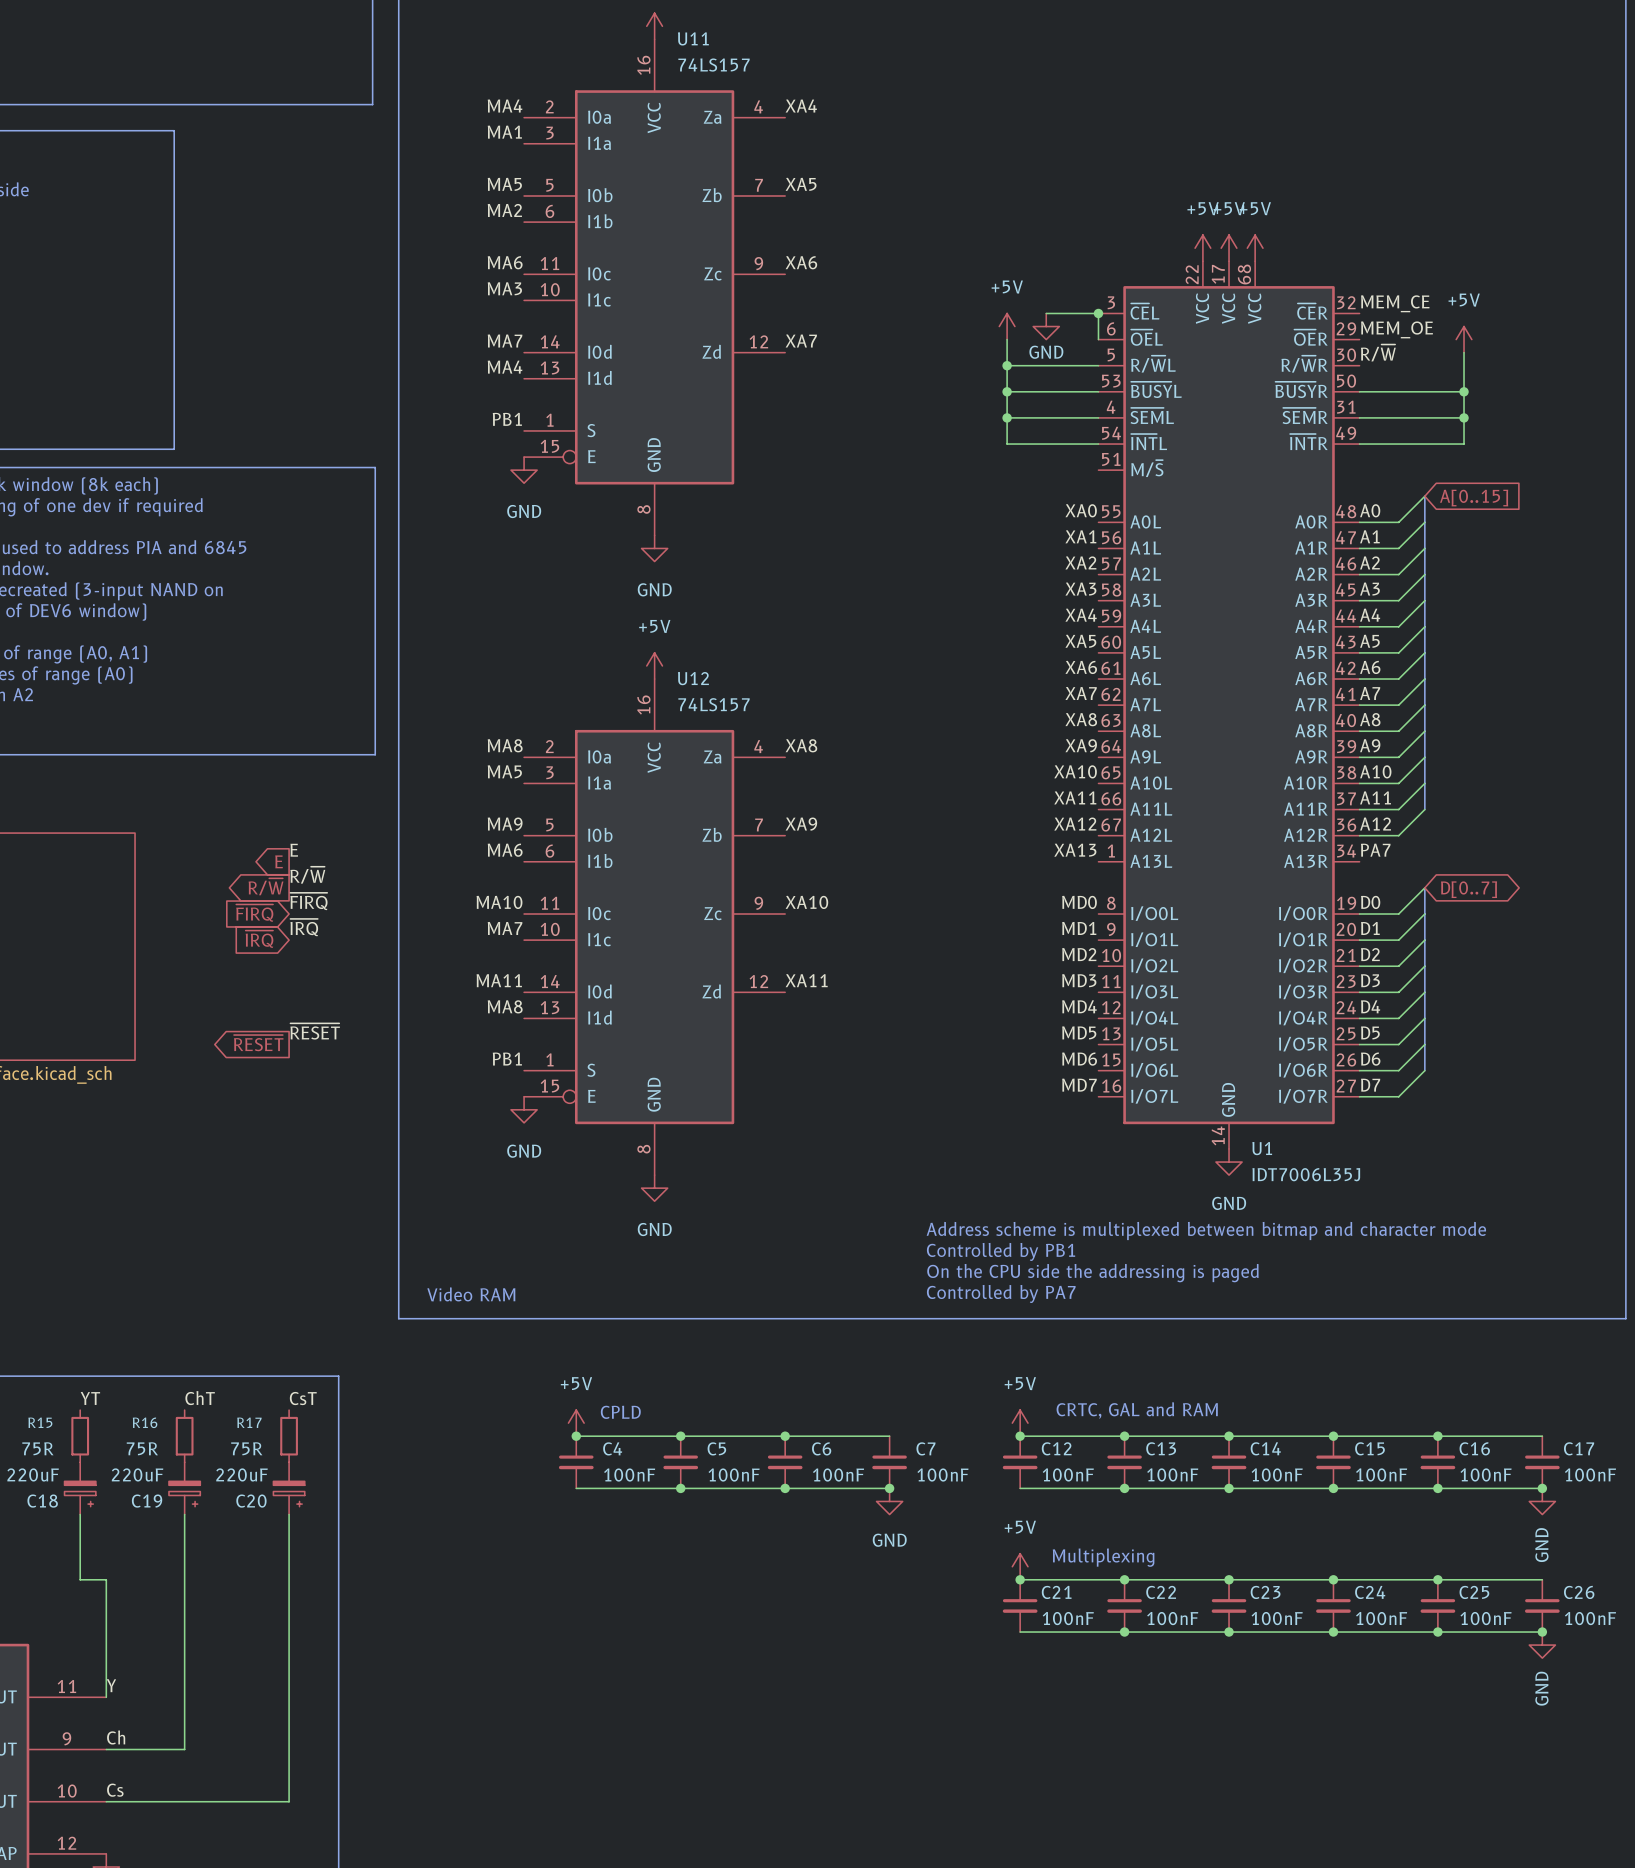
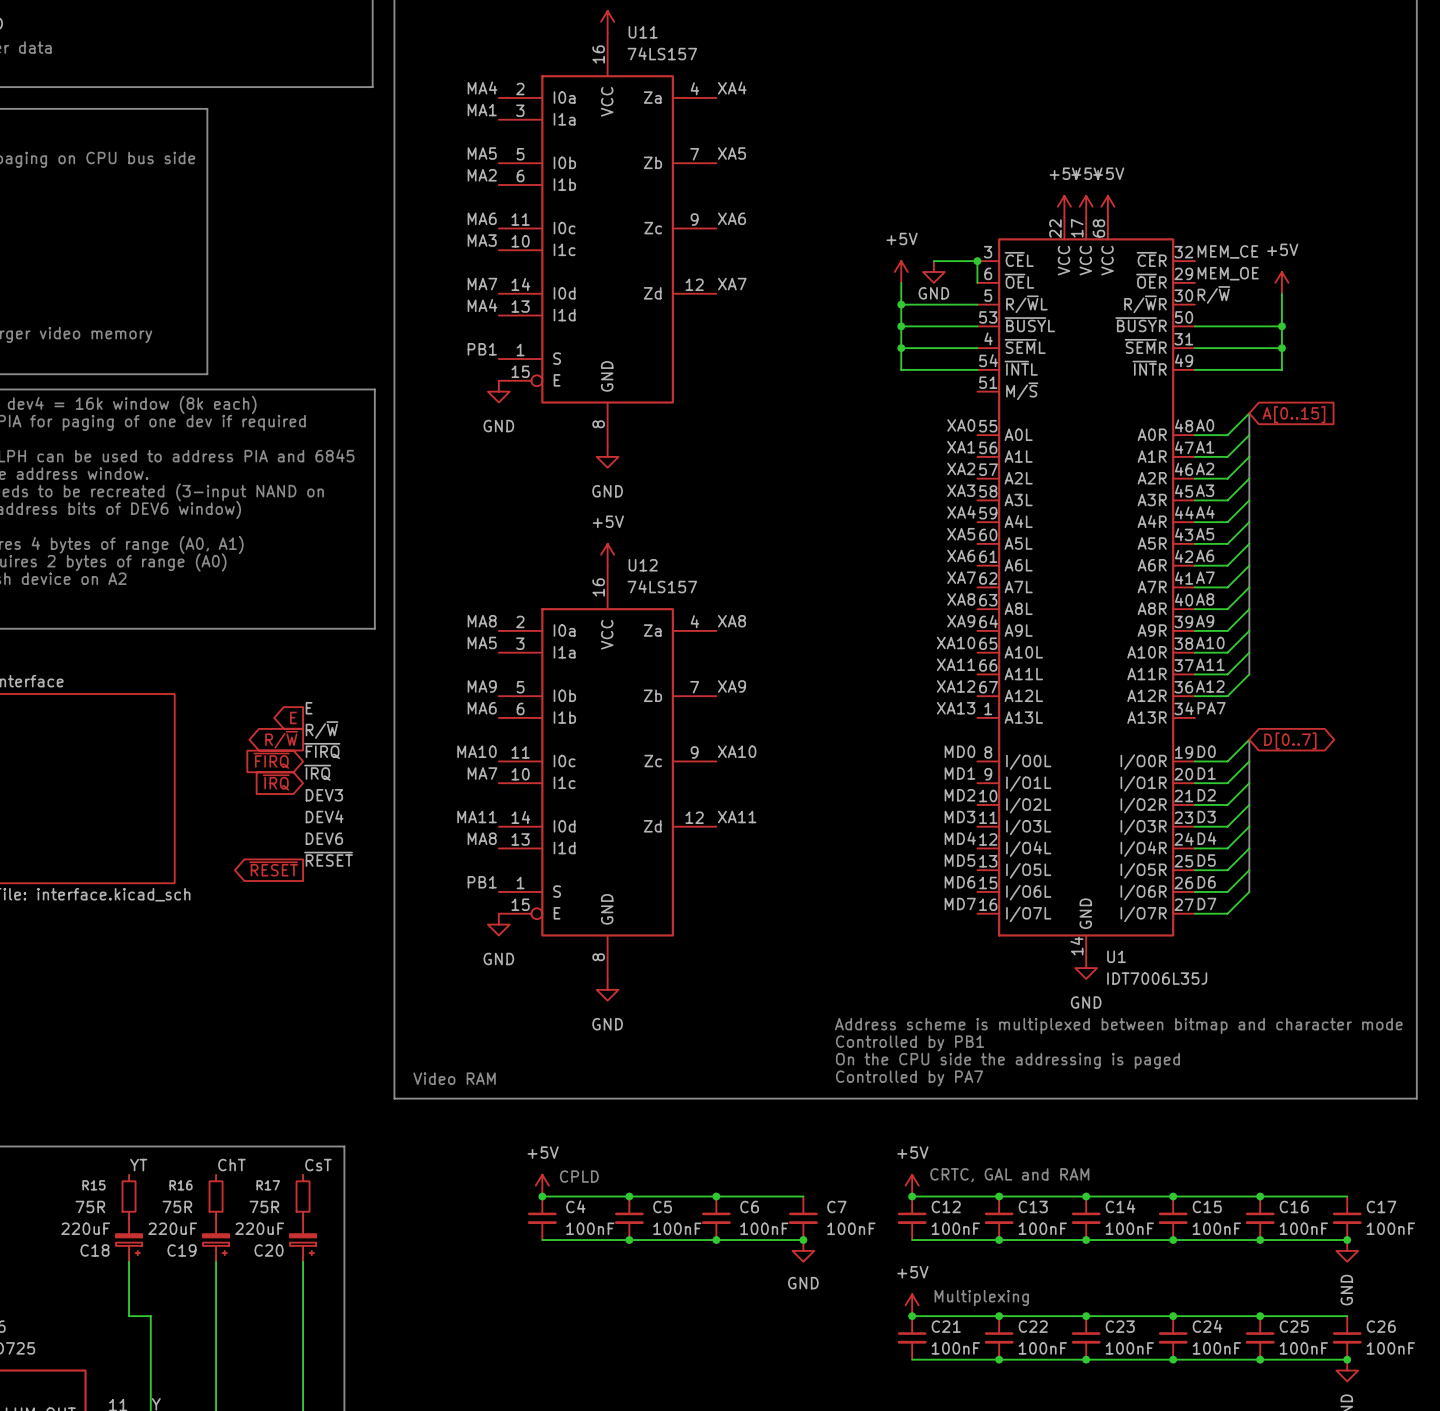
label: none -> DEV3 (324, 795)
label: none -> DEV4 (324, 816)
label: none -> DEV6 (324, 838)

